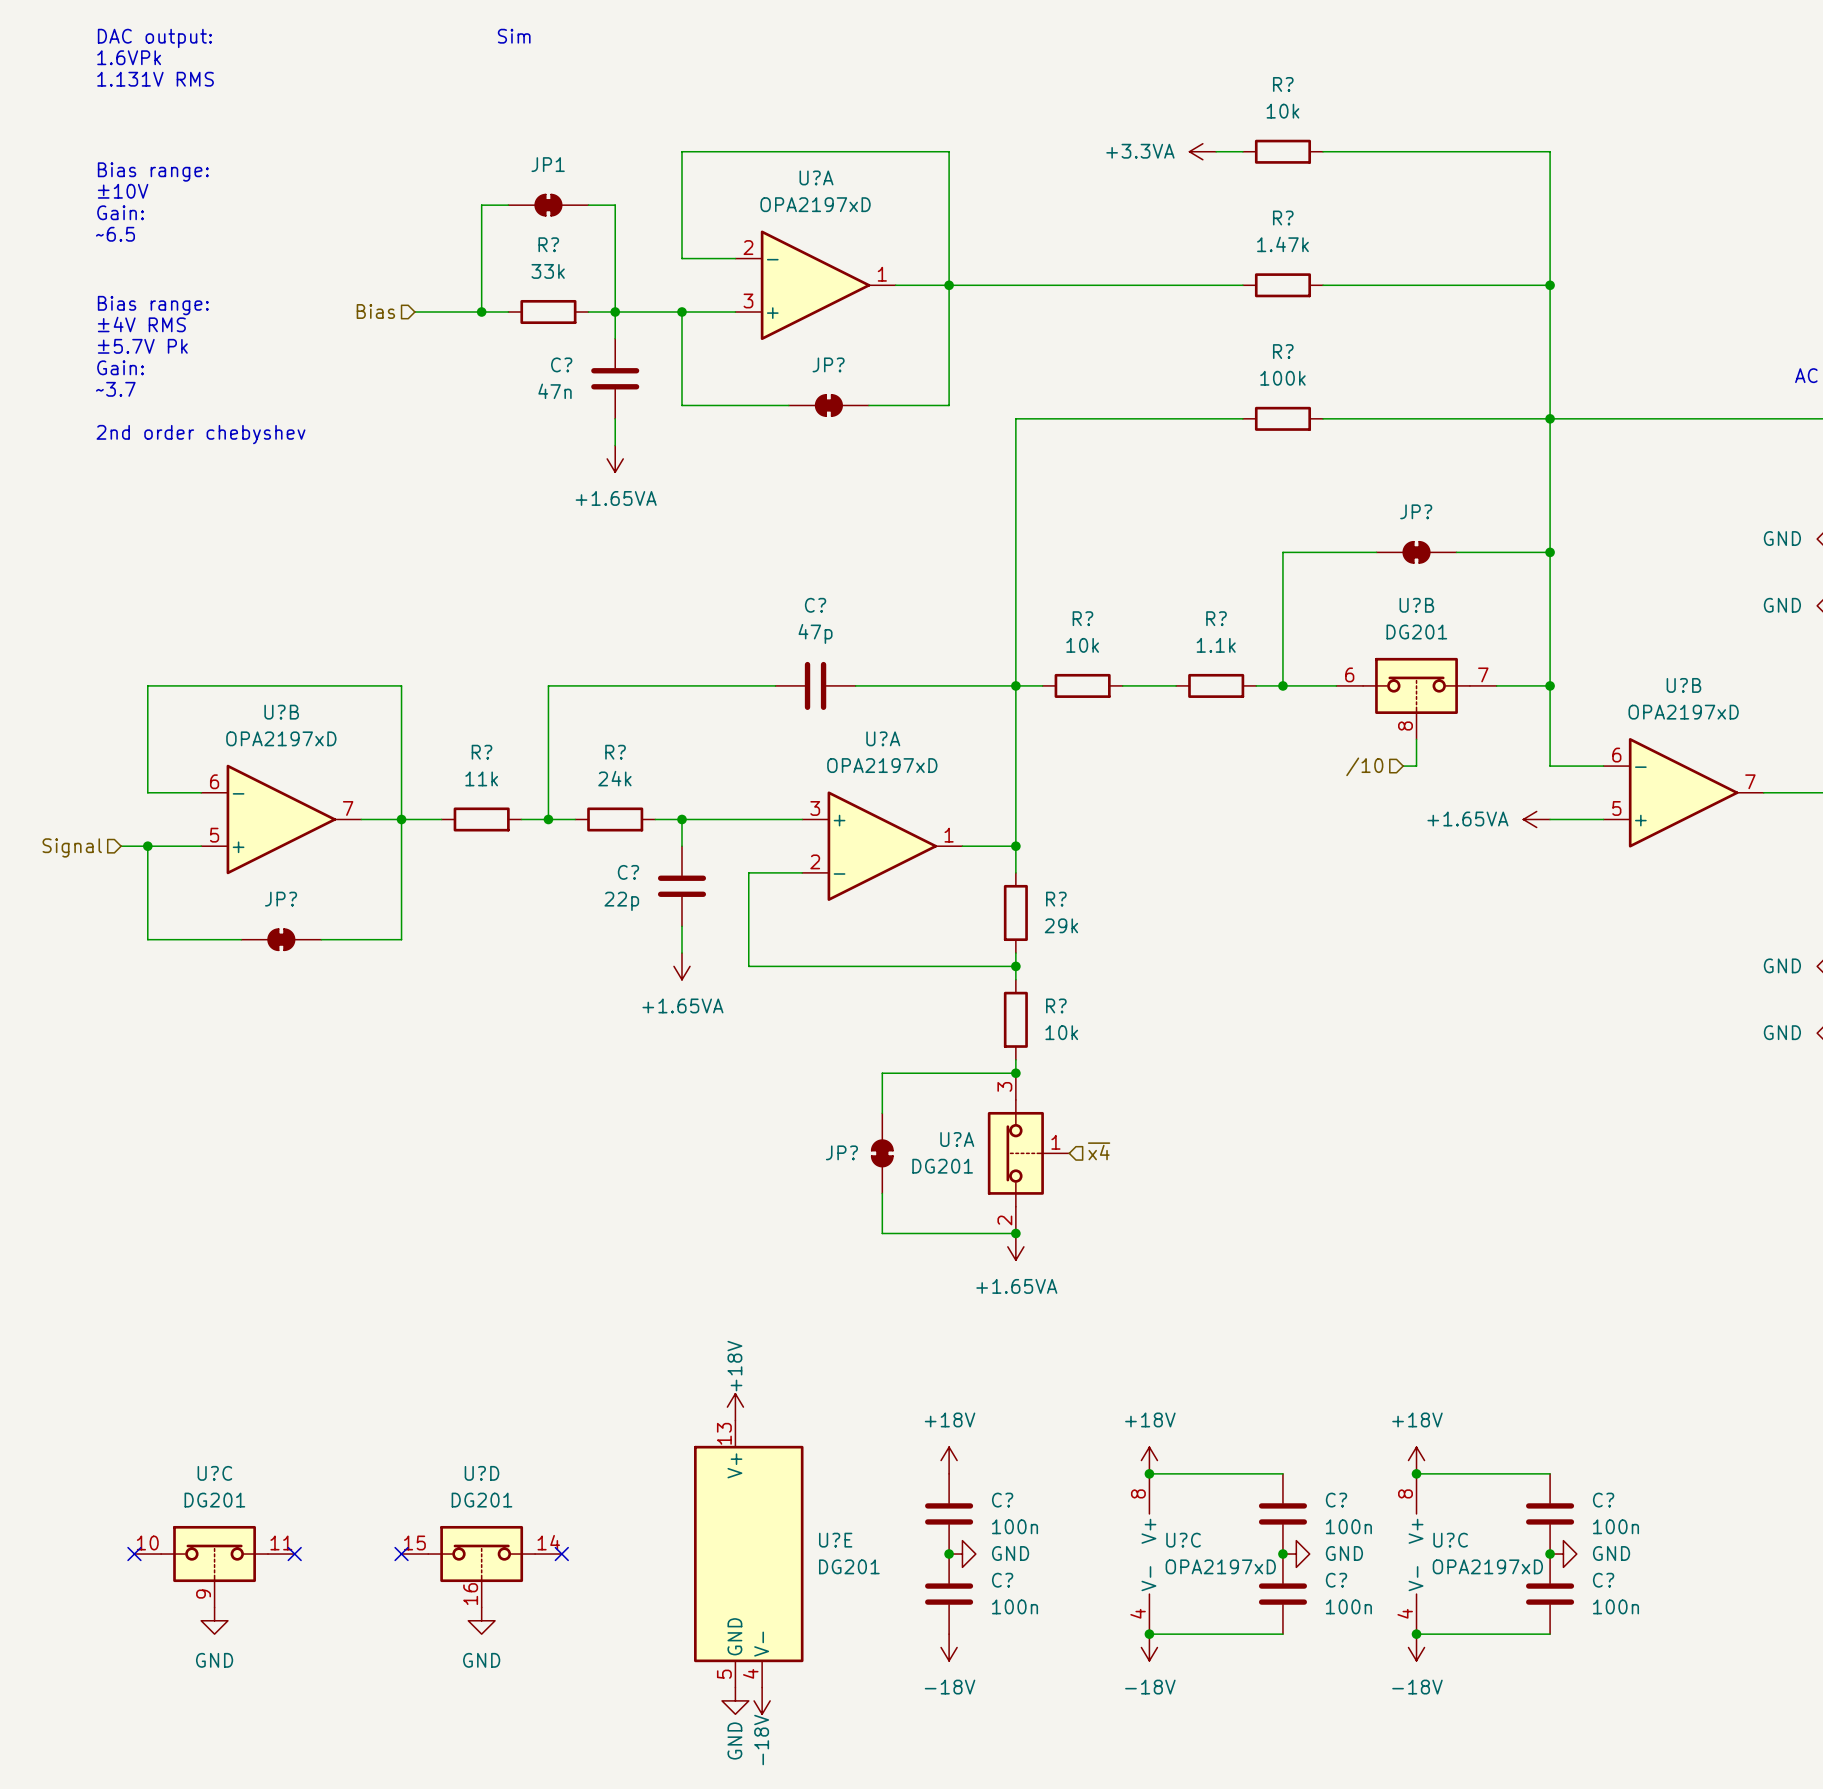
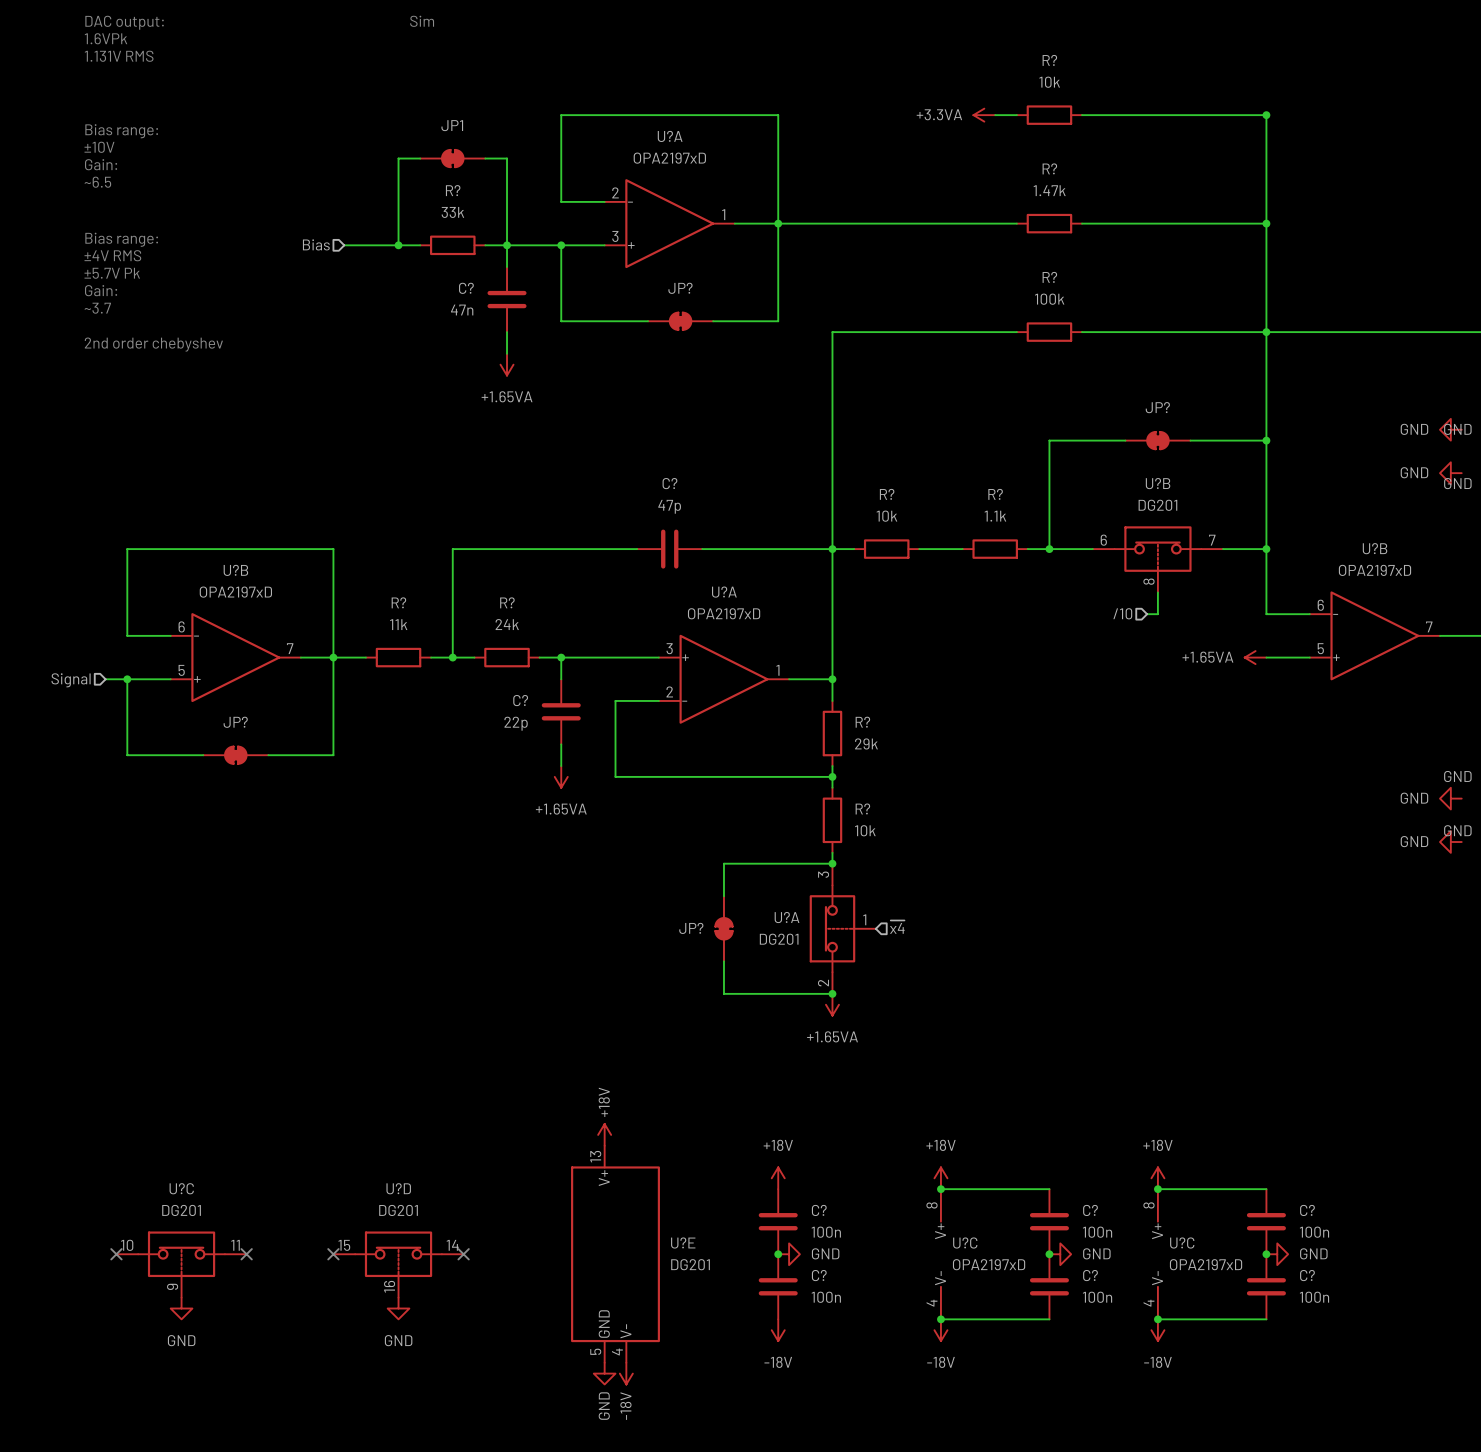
junction: none -> (1266, 115)
power symbol: none -> GND (1450, 429)
power symbol: none -> GND (1450, 473)
power symbol: none -> GND (1450, 798)
power symbol: none -> GND (1450, 842)

